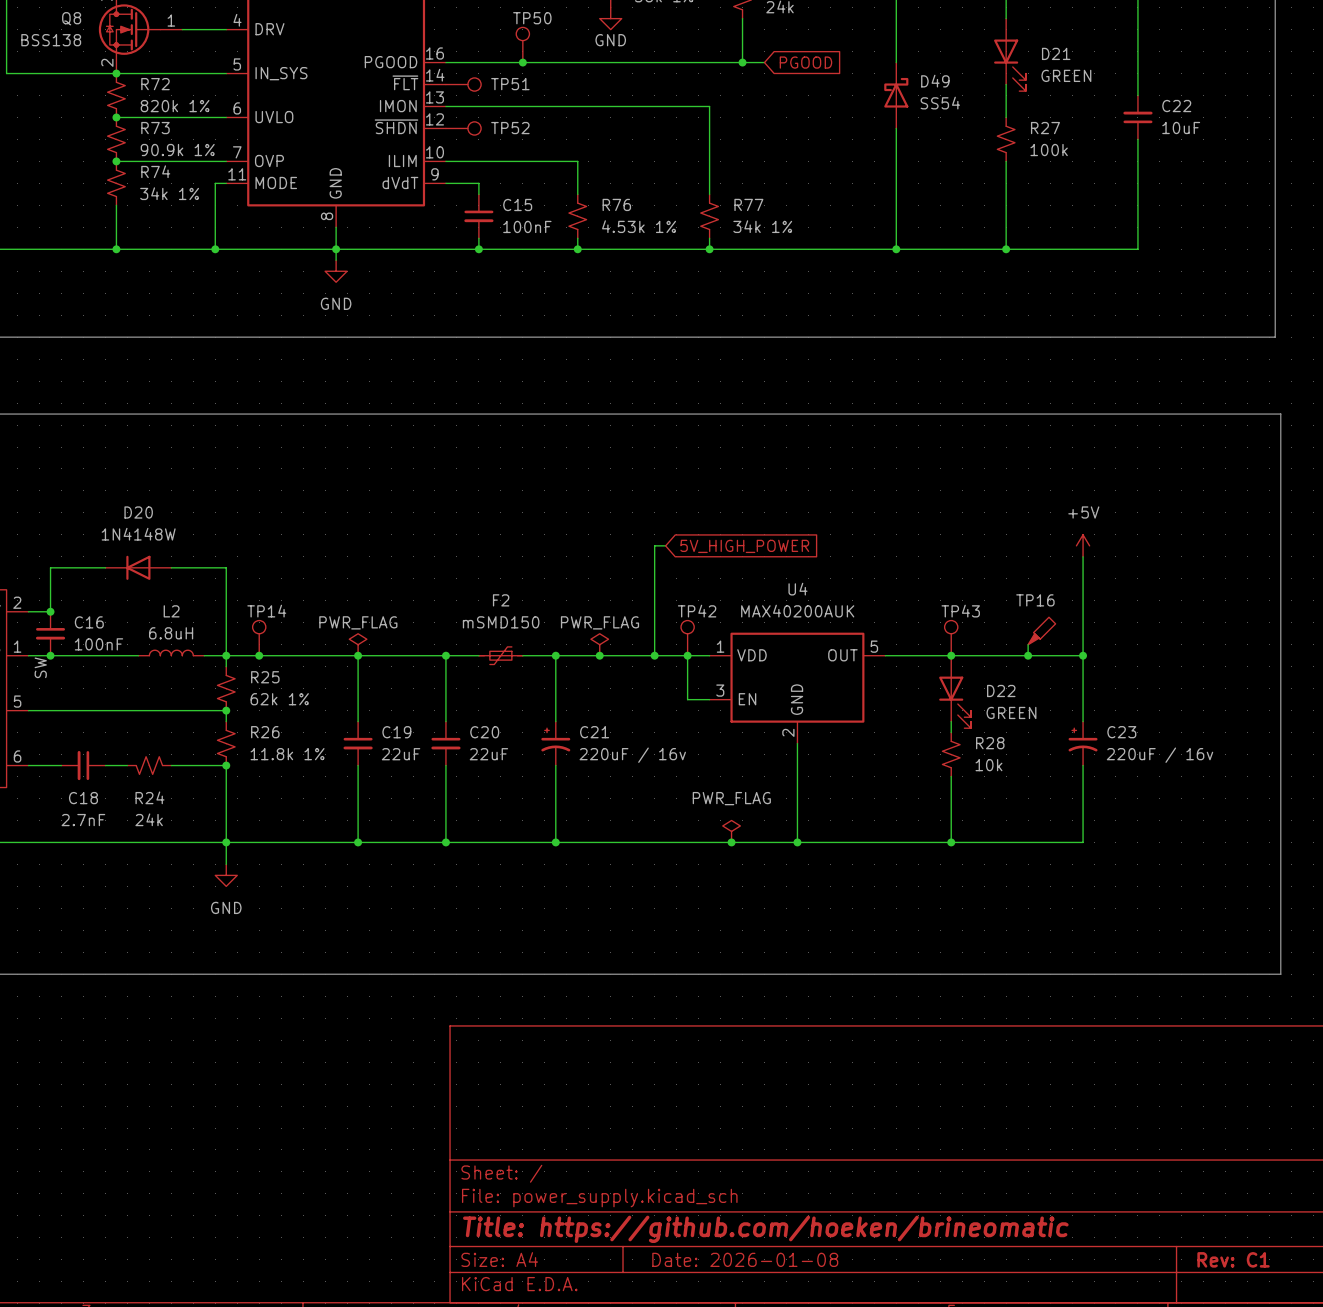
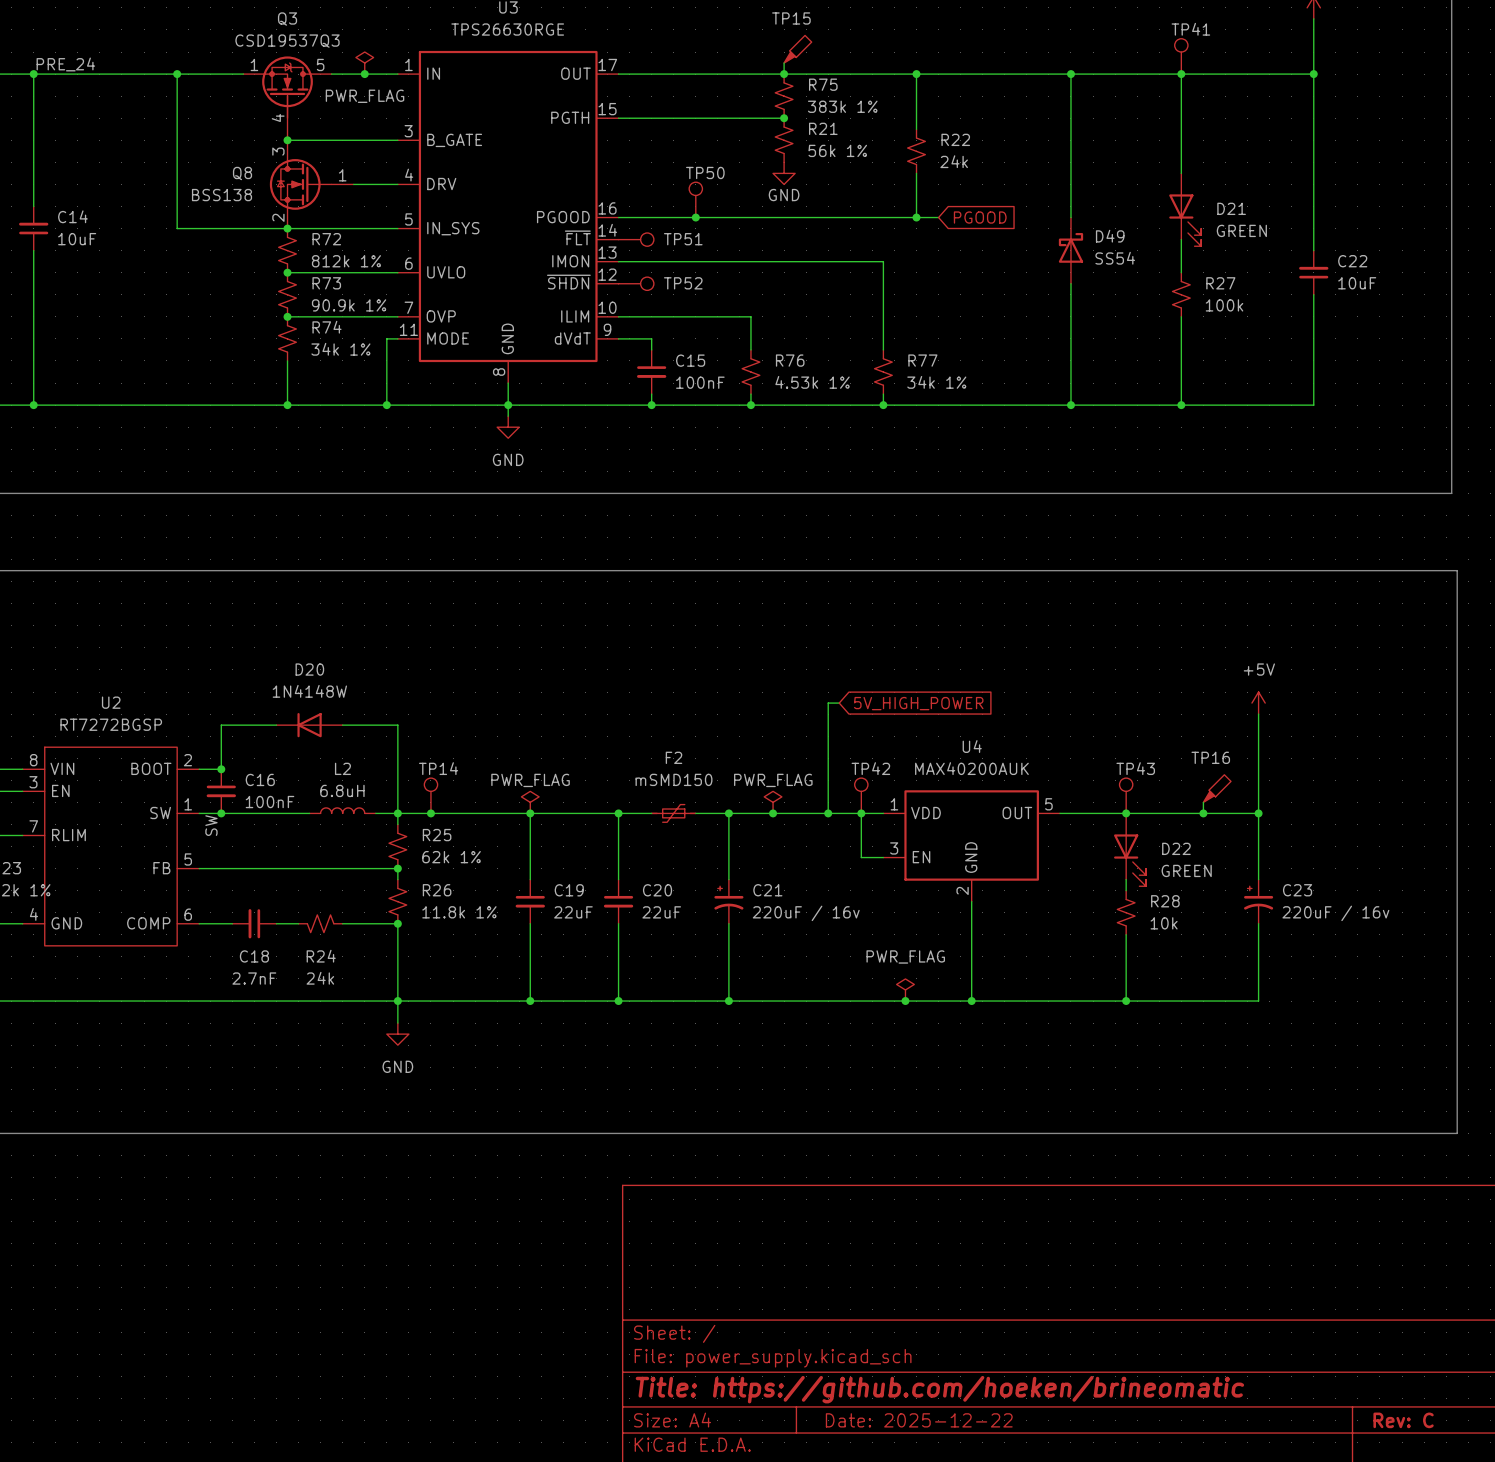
R72 value: 820k 1% (175, 106) -> 812k 1% (346, 261)
title block: Date: 2026-01-08 (745, 1259) -> Date: 2025-12-22 (919, 1420)
title block: Rev: C1 (1233, 1259) -> Rev: C (1403, 1420)

